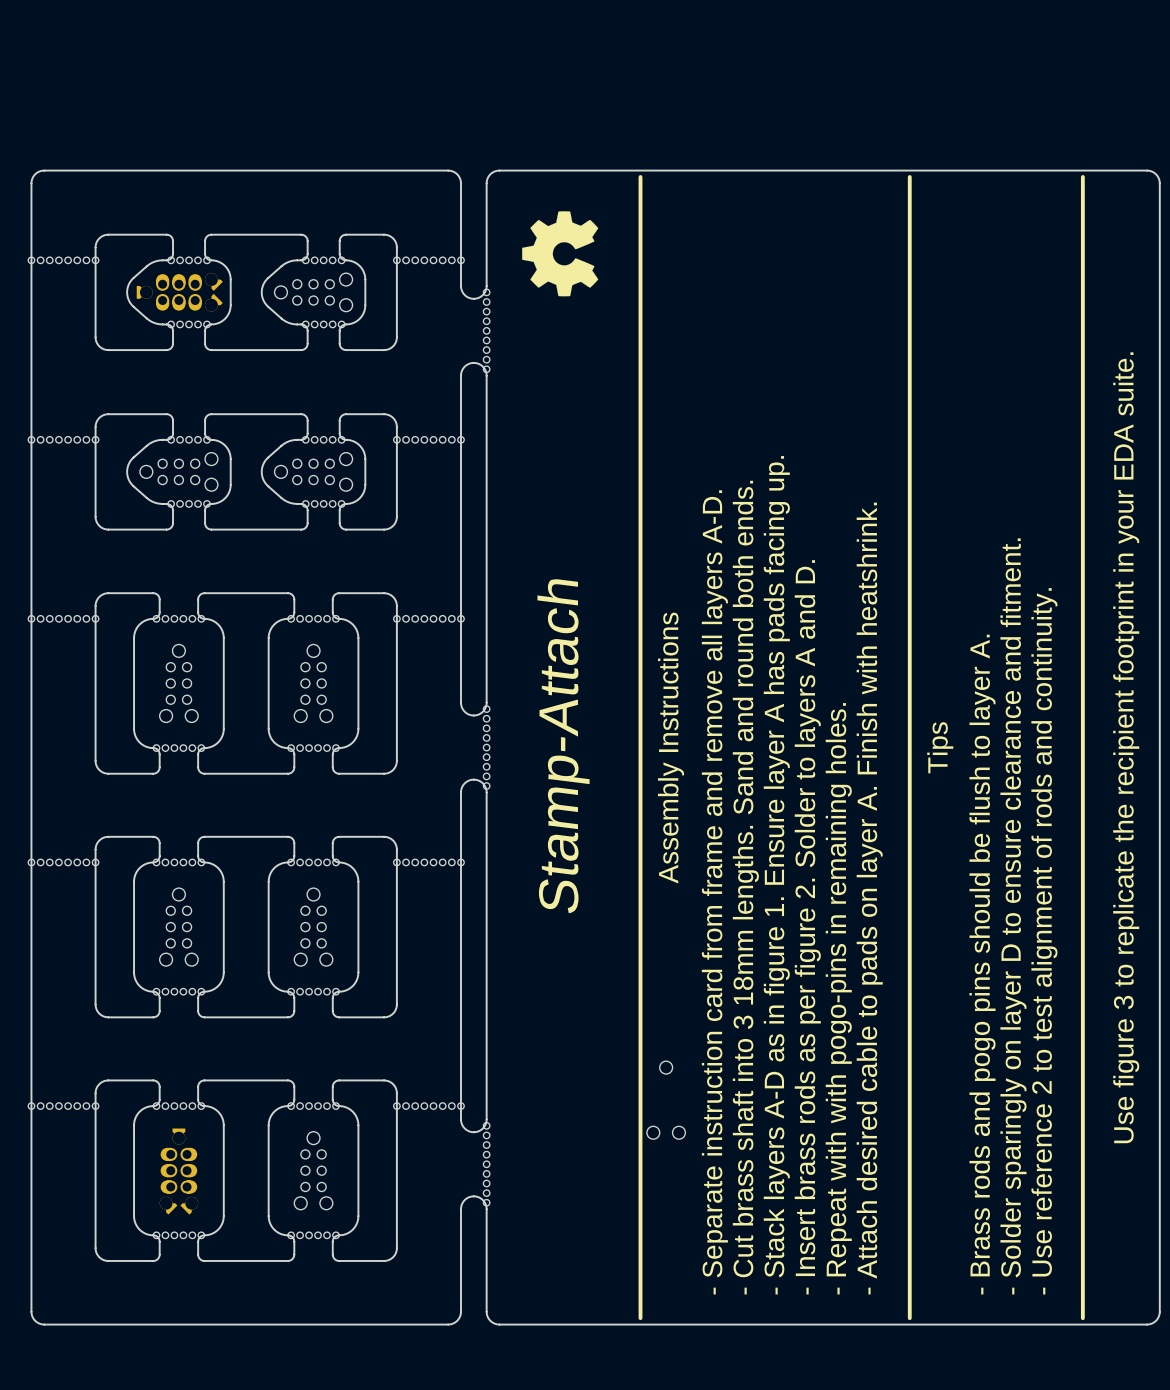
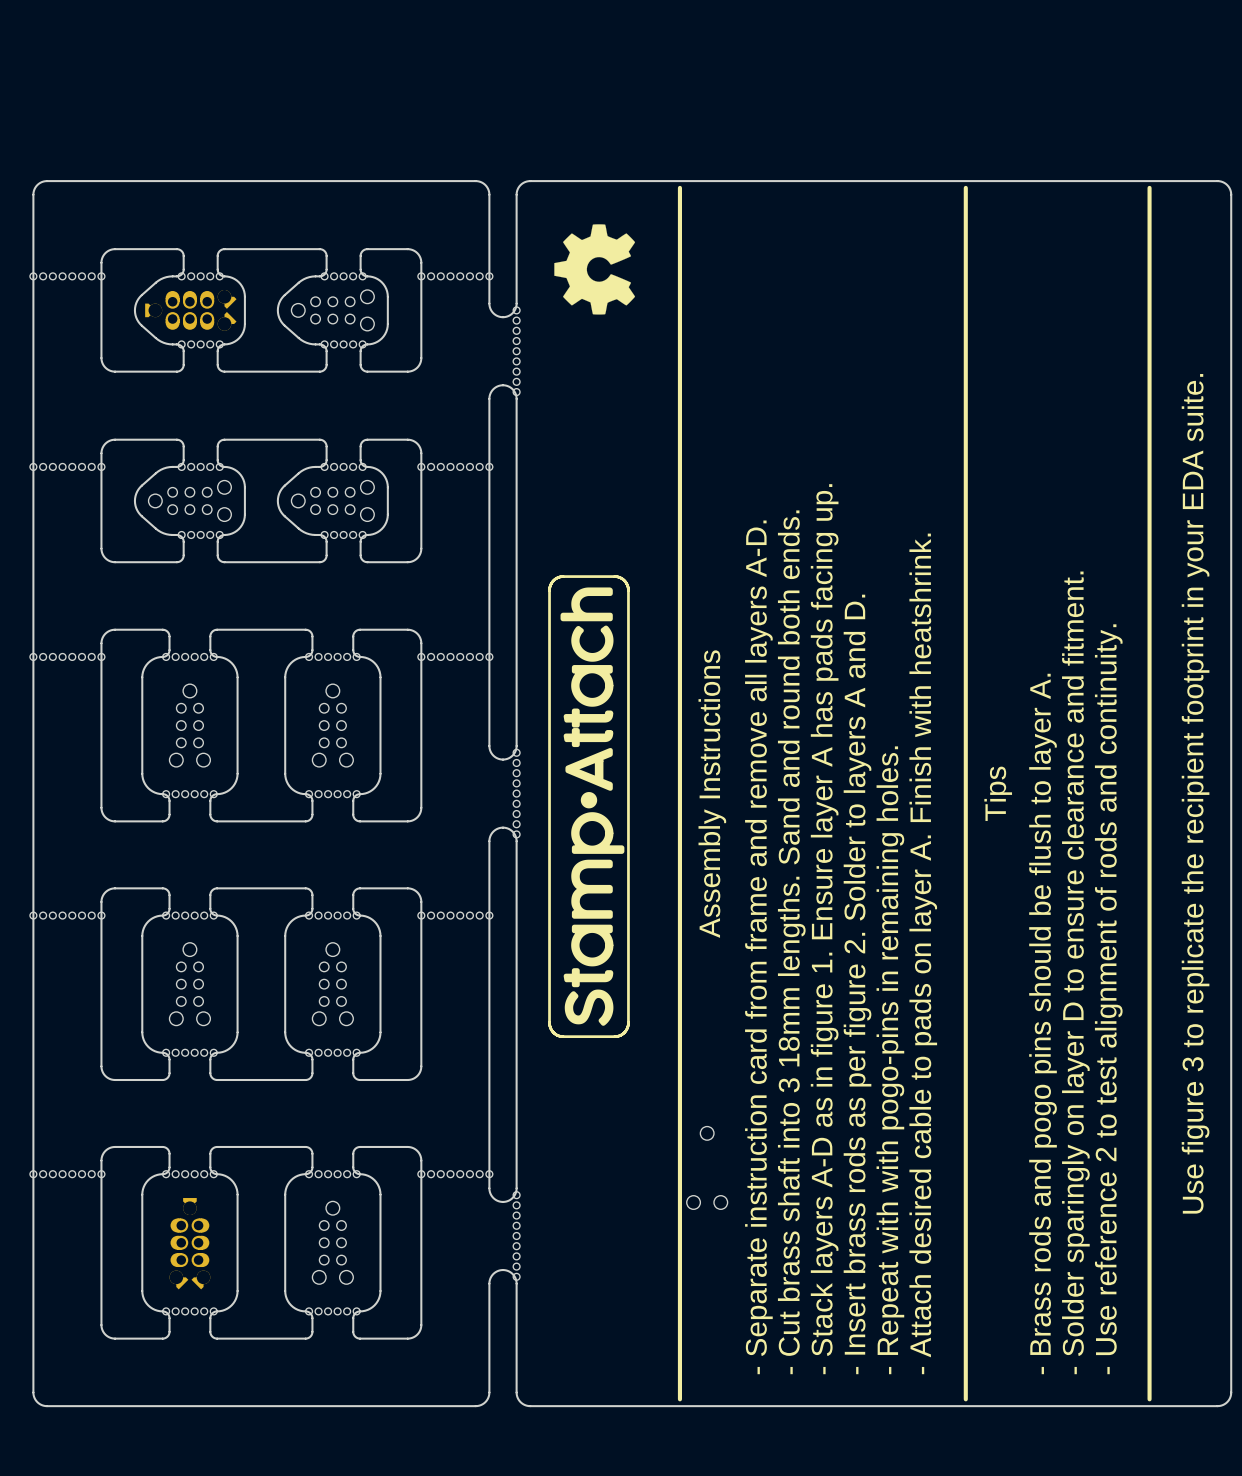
line: none -> (616, 576) (560, 576) (553, 581) (549, 589) (549, 1023) (553, 1032) (561, 1036) (617, 1036) (624, 1032) (628, 1024) (628, 589) (624, 580) (616, 576)
drawing: none -> [560, 587, 625, 1026]
text: Stamp-Attach (563, 745) -> none

